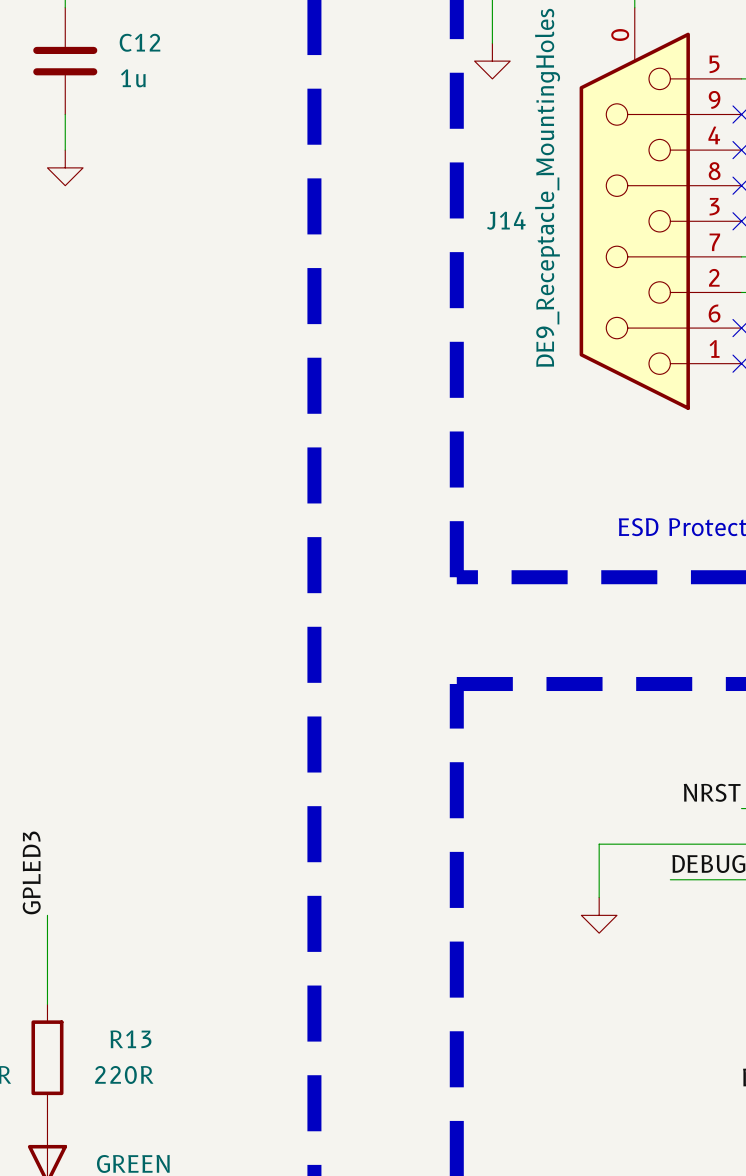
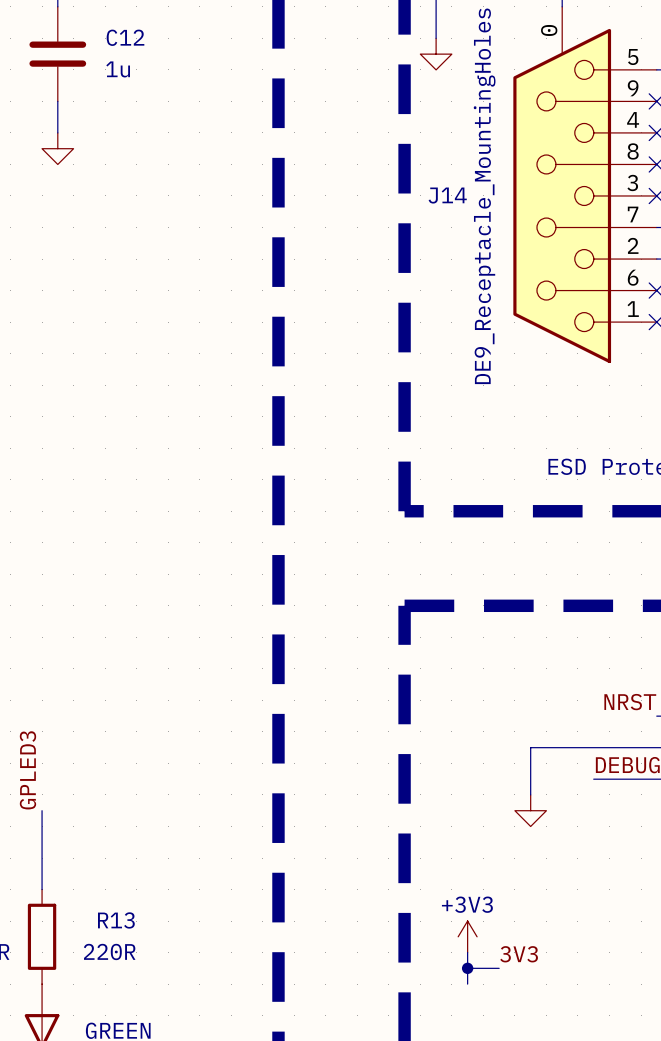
power symbol: none -> +3V3 (467, 936)
wire: none -> (467, 952) (467, 984)
label: none -> 3V3 (519, 954)
wire: none -> (467, 968) (499, 968)
junction: none -> (467, 968)

